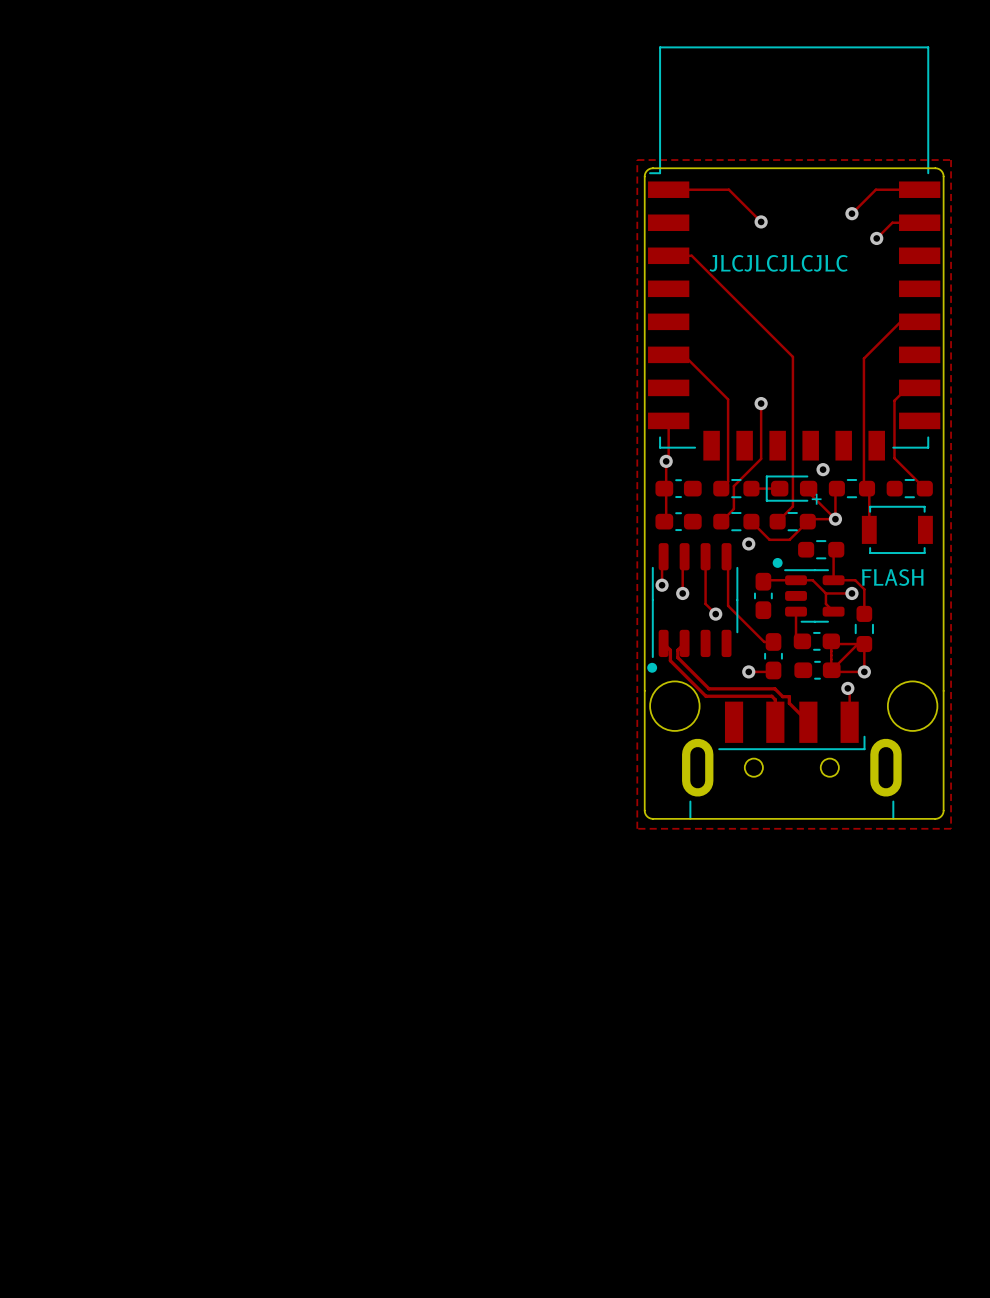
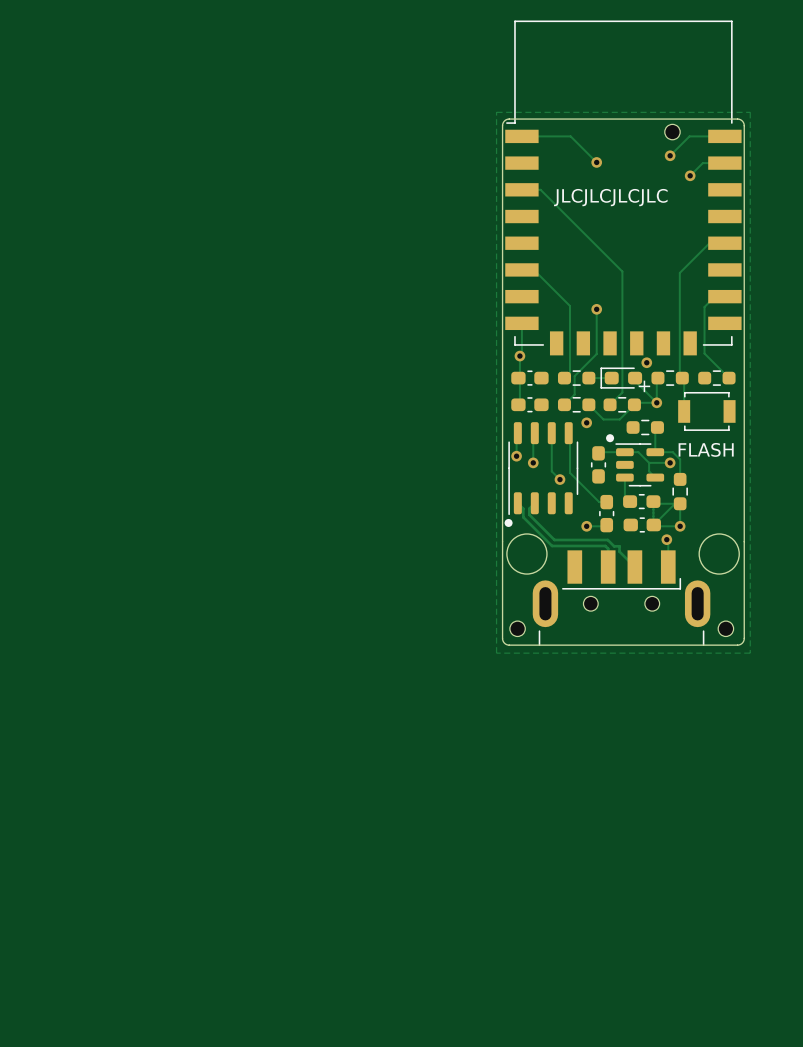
part: none -> (672, 132)
part: none -> (517, 628)
part: none -> (725, 628)

